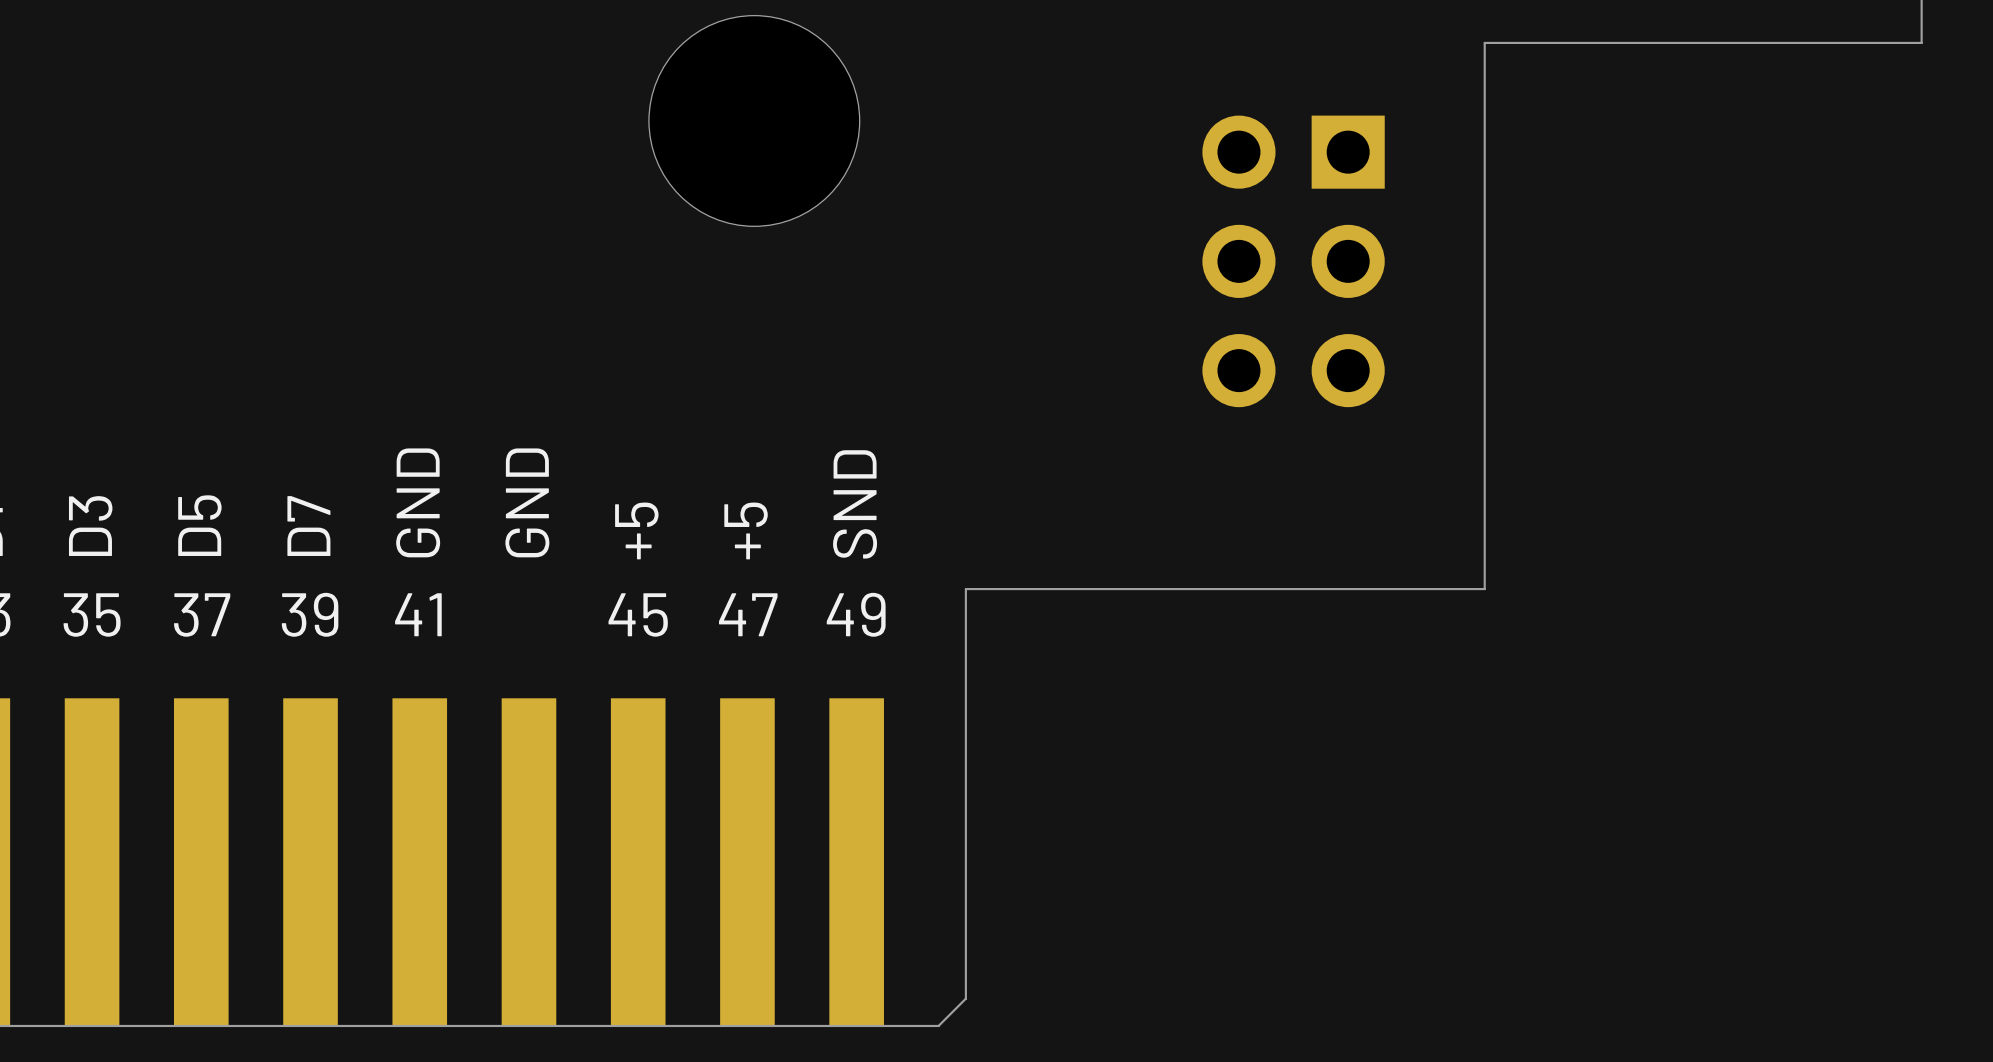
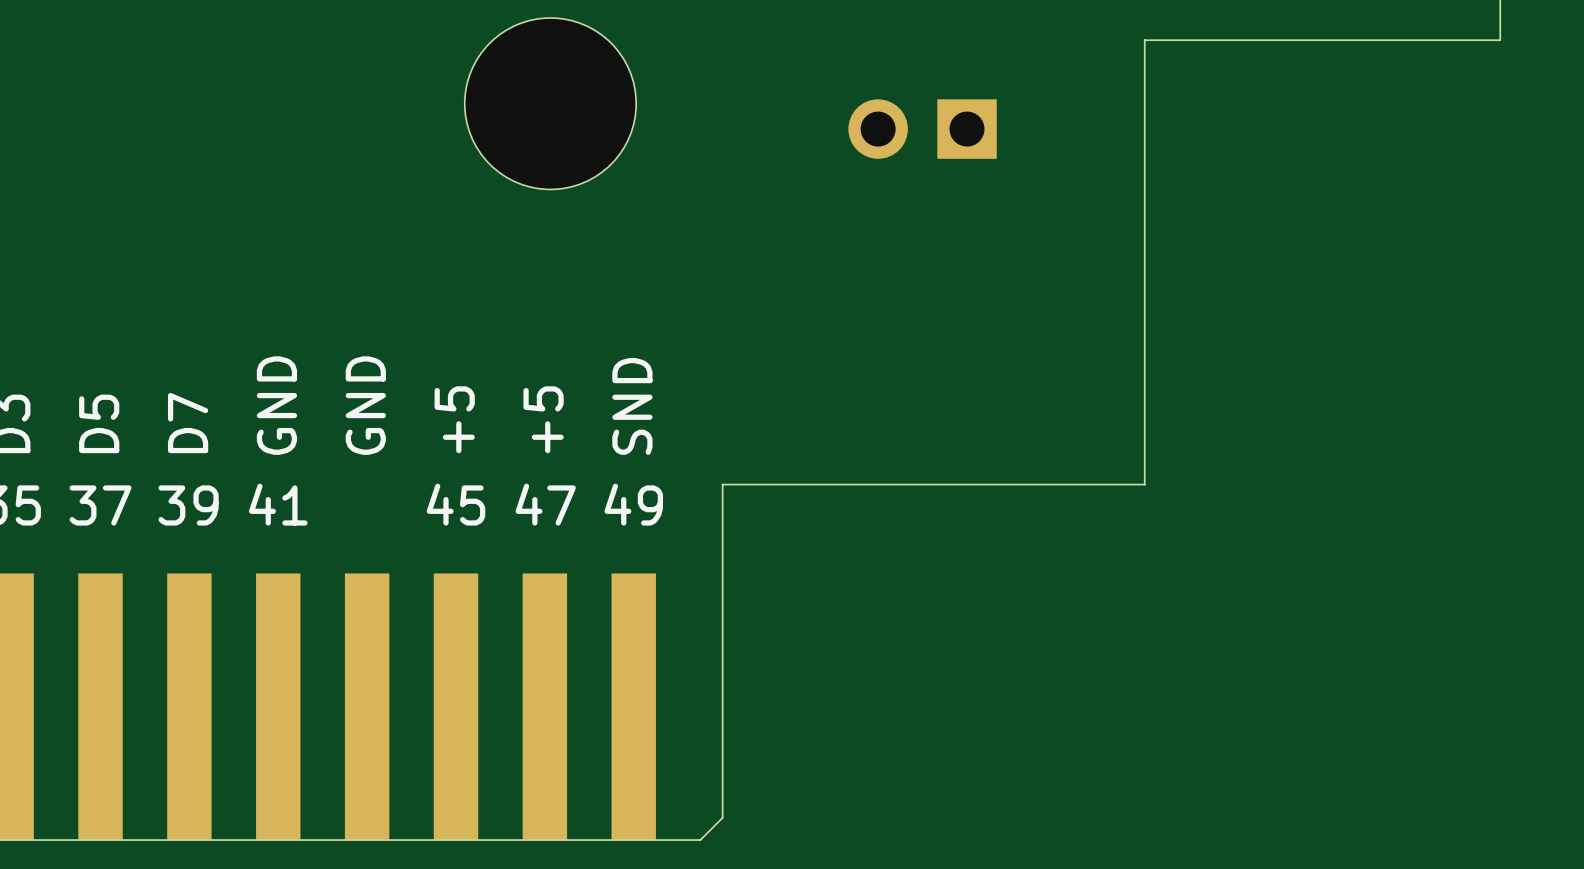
part: none -> (922, 129)
part: (1293, 261) -> none

